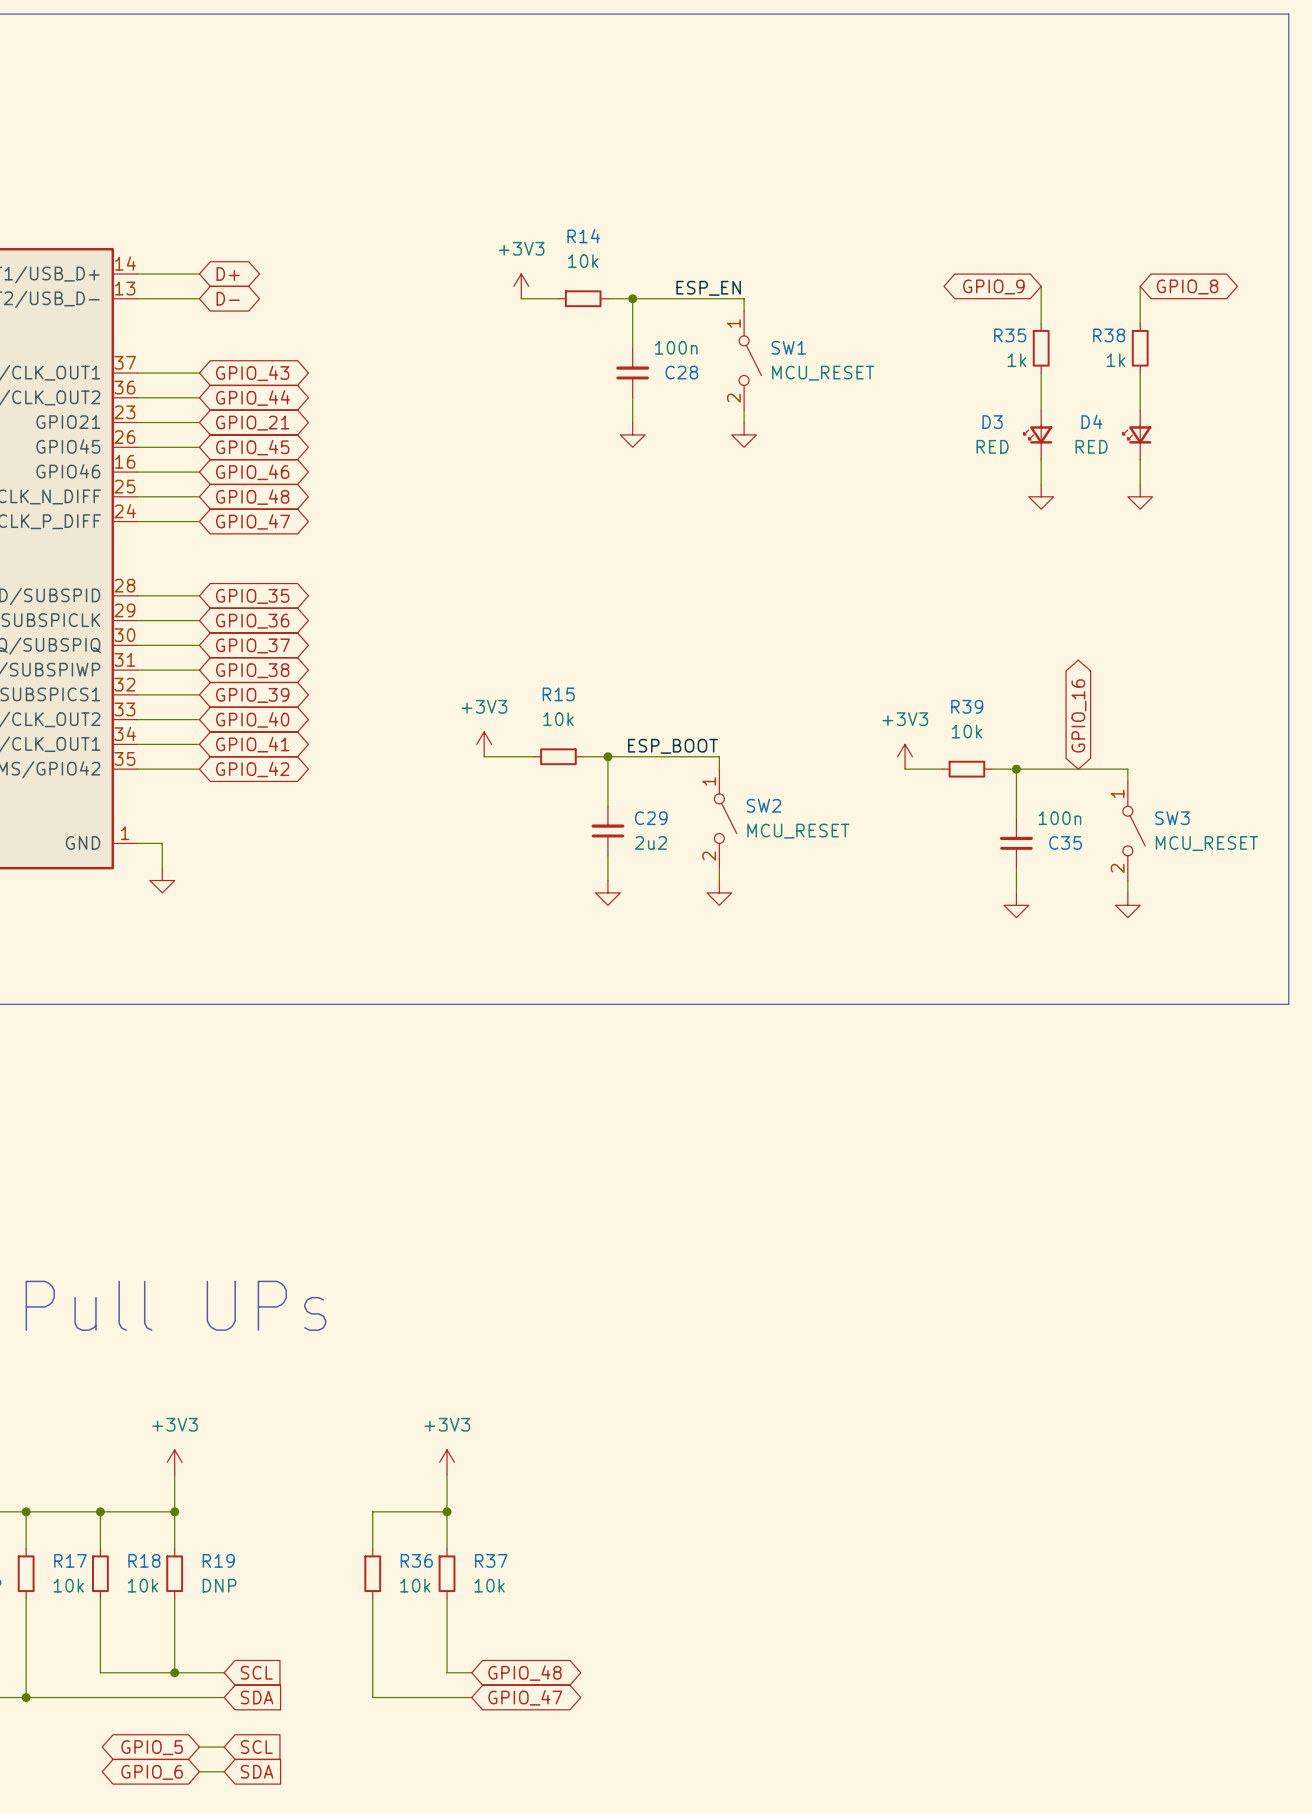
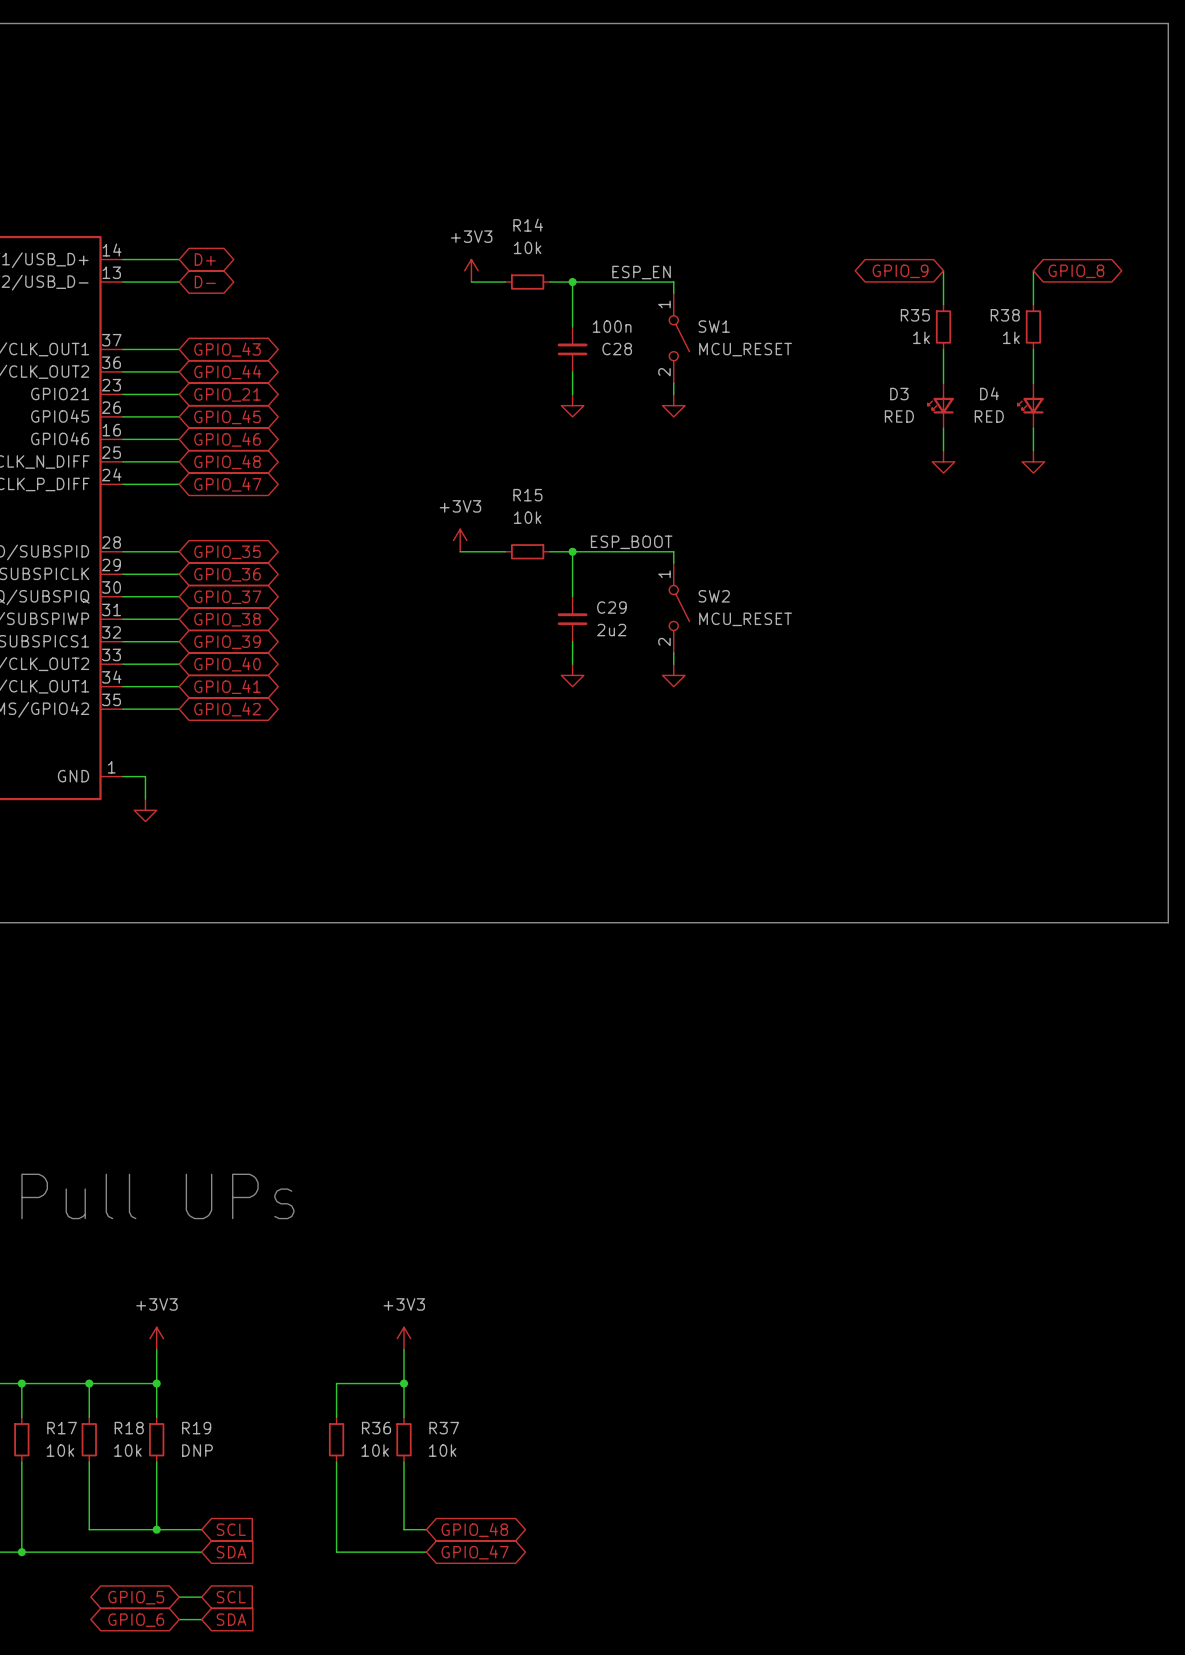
junction: none -> (572, 551)
global label: GPIO_16 (1078, 715) -> none
power symbol: none -> (572, 675)
power symbol: none -> (673, 675)
power symbol position: +3V3 (484, 744) -> +3V3 (460, 540)
label position: ESP_BOOT (672, 746) -> ESP_BOOT (631, 542)
wire: (484, 756) (533, 756) -> (460, 551) (505, 551)
R15 position: (558, 756) -> (527, 551)
wire: (583, 756) (719, 756) (719, 769) -> (550, 551) (673, 551) (673, 563)
wire: (607, 756) (607, 806) -> (572, 551) (572, 596)
junction: (607, 756) -> none
power symbol: +3V3 (905, 756) -> none
wire: (905, 769) (942, 769) -> none
R39: 10k (966, 769) -> none
wire: (991, 769) (1127, 769) (1127, 781) -> none
wire: (1016, 769) (1016, 818) -> none
junction: (1016, 769) -> none
SW2 position: (725, 818) -> (679, 607)
C29 position: (607, 831) -> (572, 619)
SW3: MCU_RESET (1134, 831) -> none
C35: 100n (1016, 843) -> none
wire: (607, 855) (607, 880) -> (572, 641) (572, 664)
wire: (719, 868) (719, 880) -> (673, 652) (673, 664)
wire: (1016, 868) (1016, 892) -> none
wire: (1127, 880) (1127, 892) -> none
power symbol: (607, 892) -> none
power symbol: (719, 892) -> none
power symbol: (1016, 905) -> none
power symbol: (1127, 905) -> none

